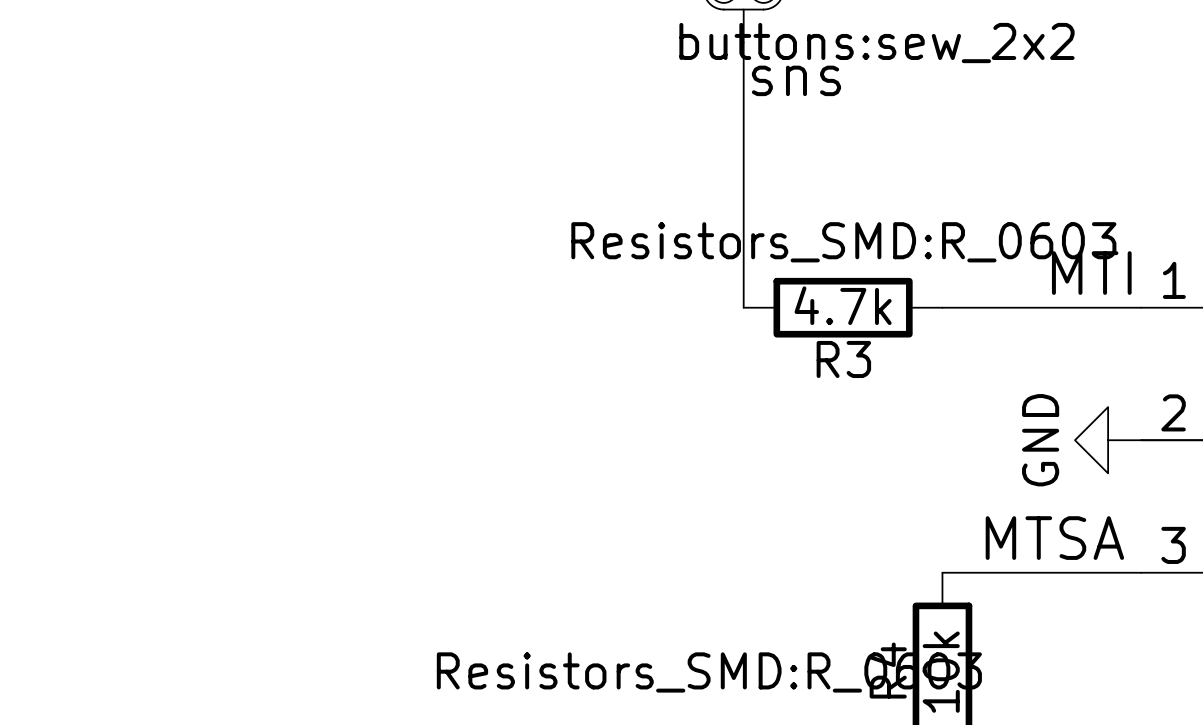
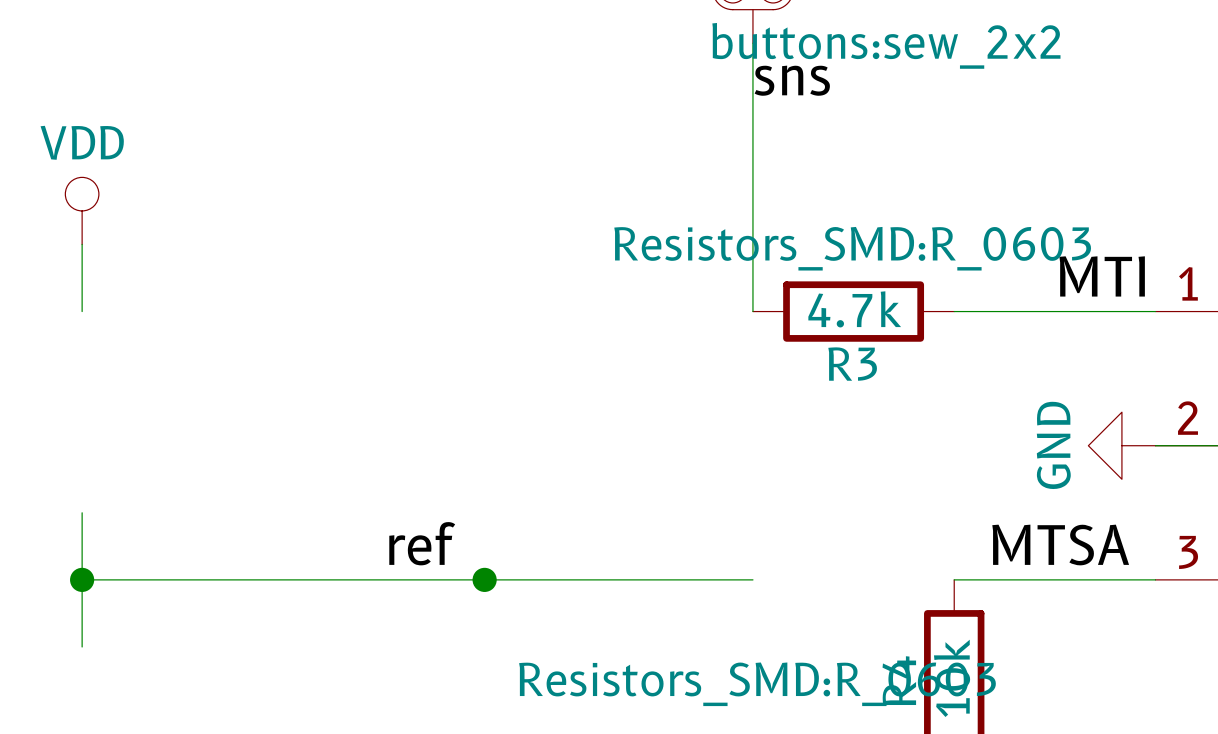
power symbol: none -> VDD (82, 210)
wire: none -> (82, 244) (82, 311)
wire: none -> (82, 512) (82, 646)
label: none -> ref (422, 543)
wire: none -> (82, 579) (752, 579)
junction: none -> (82, 579)
junction: none -> (484, 579)

